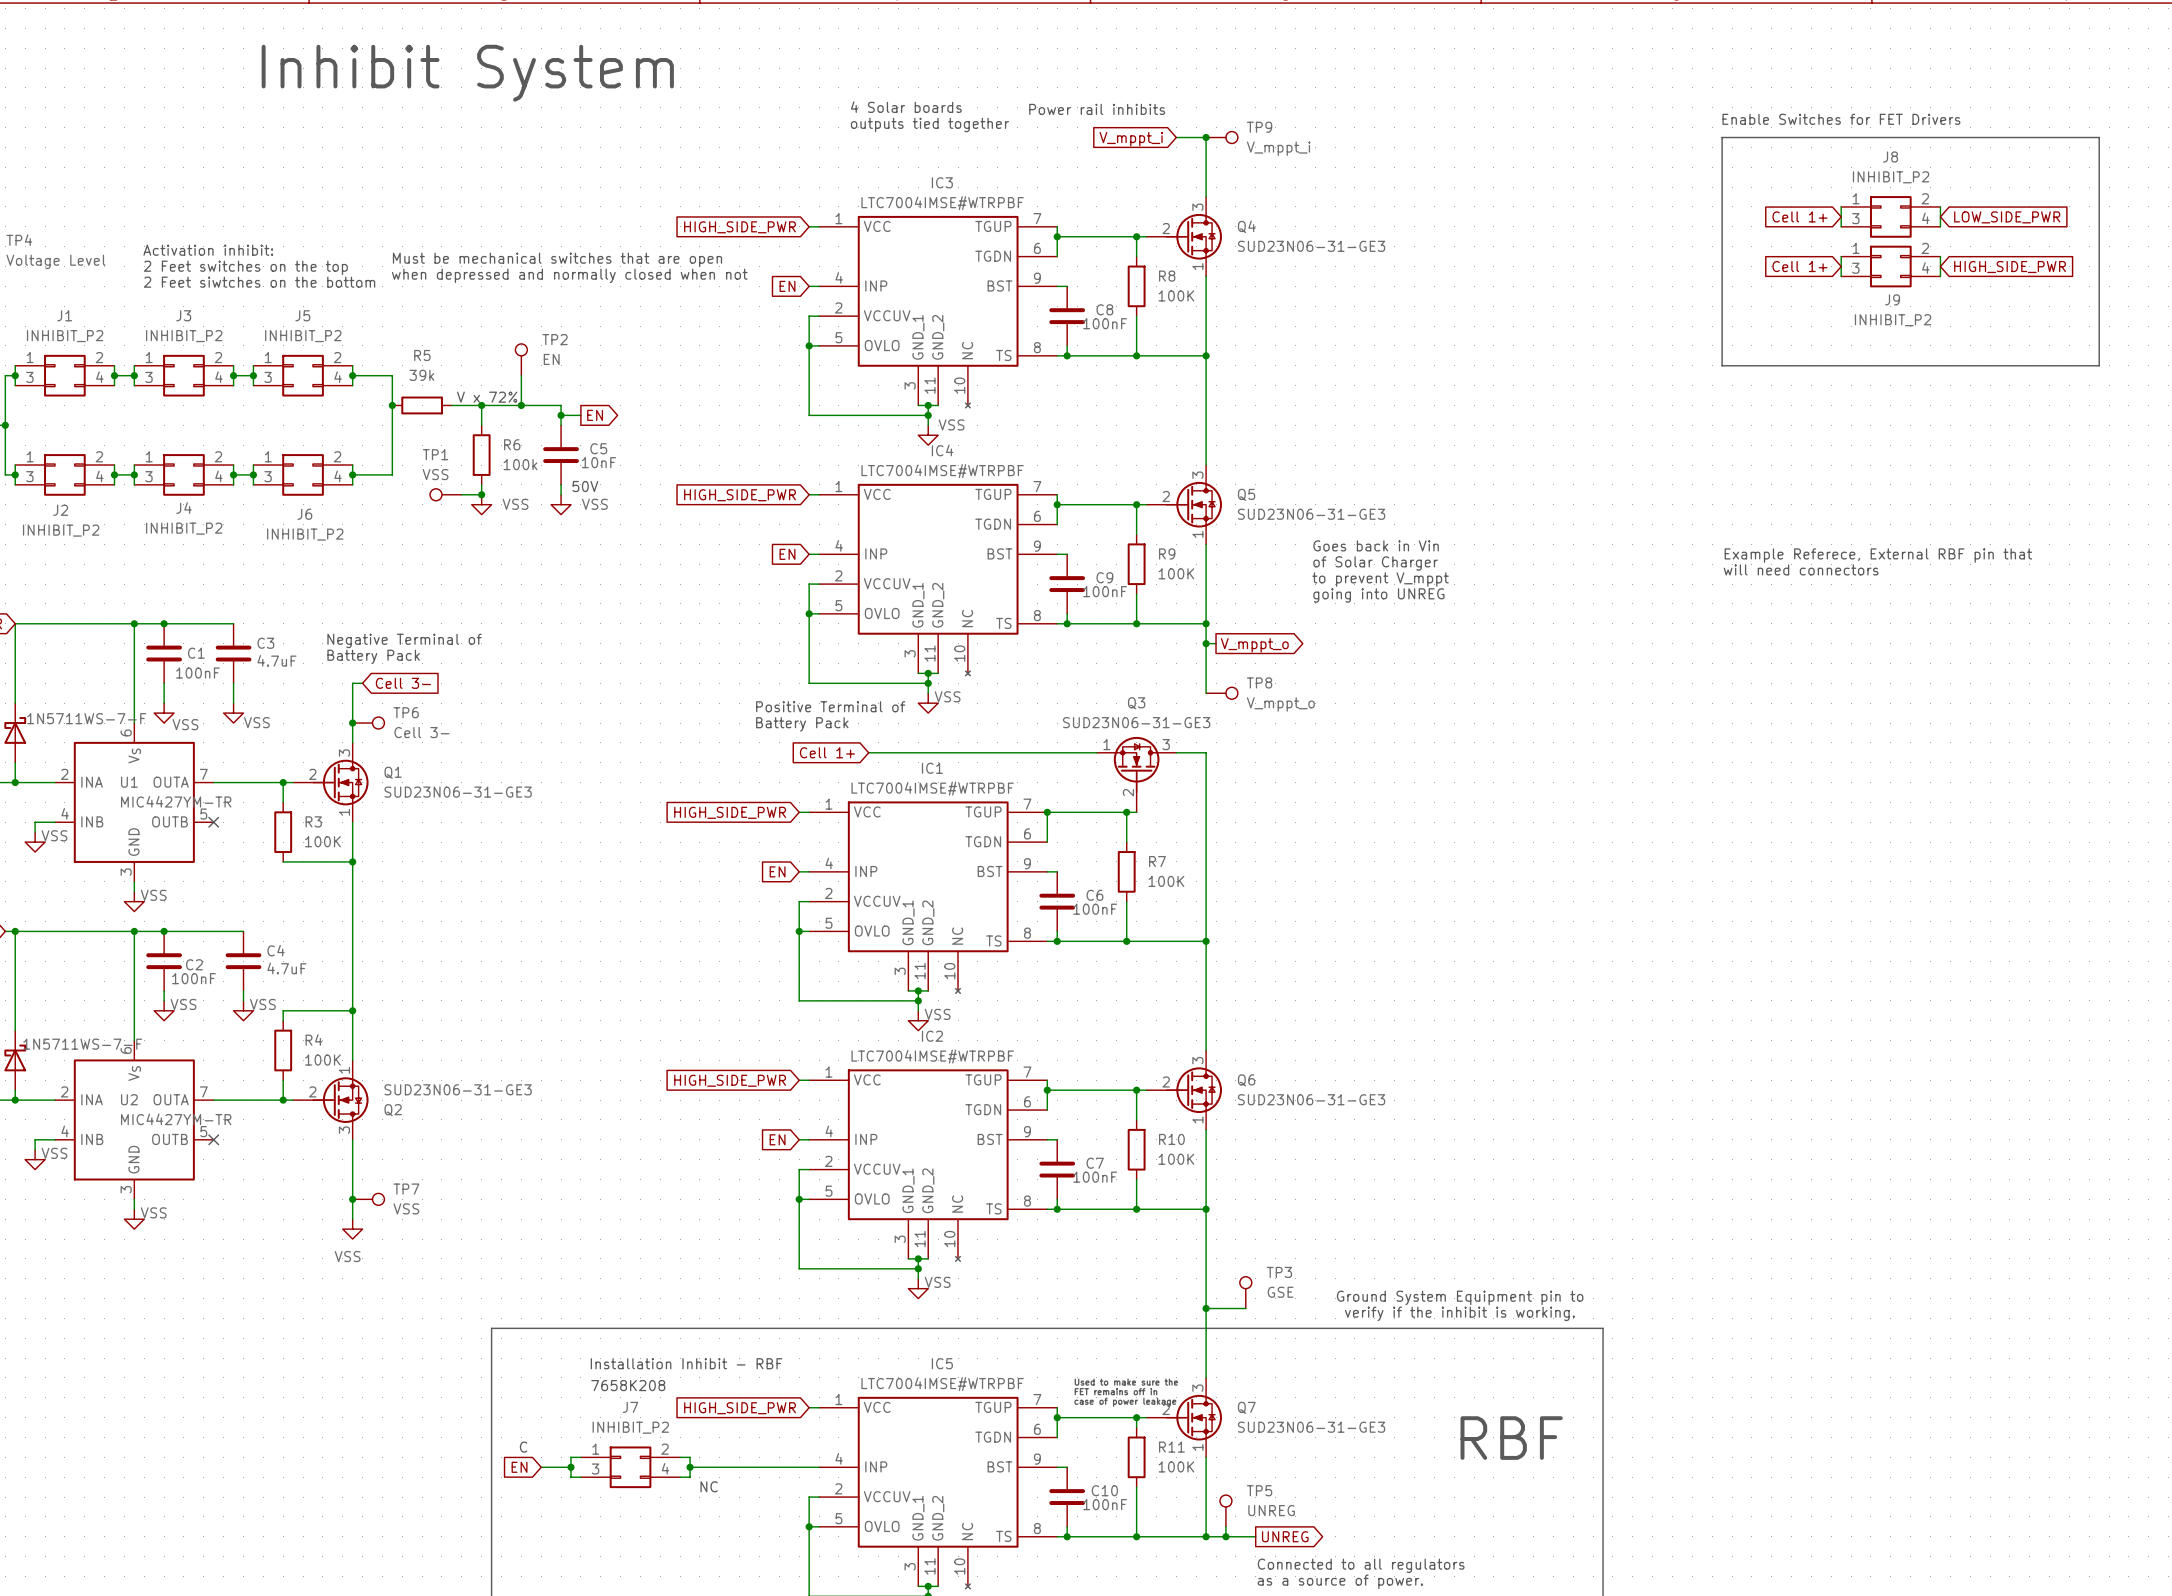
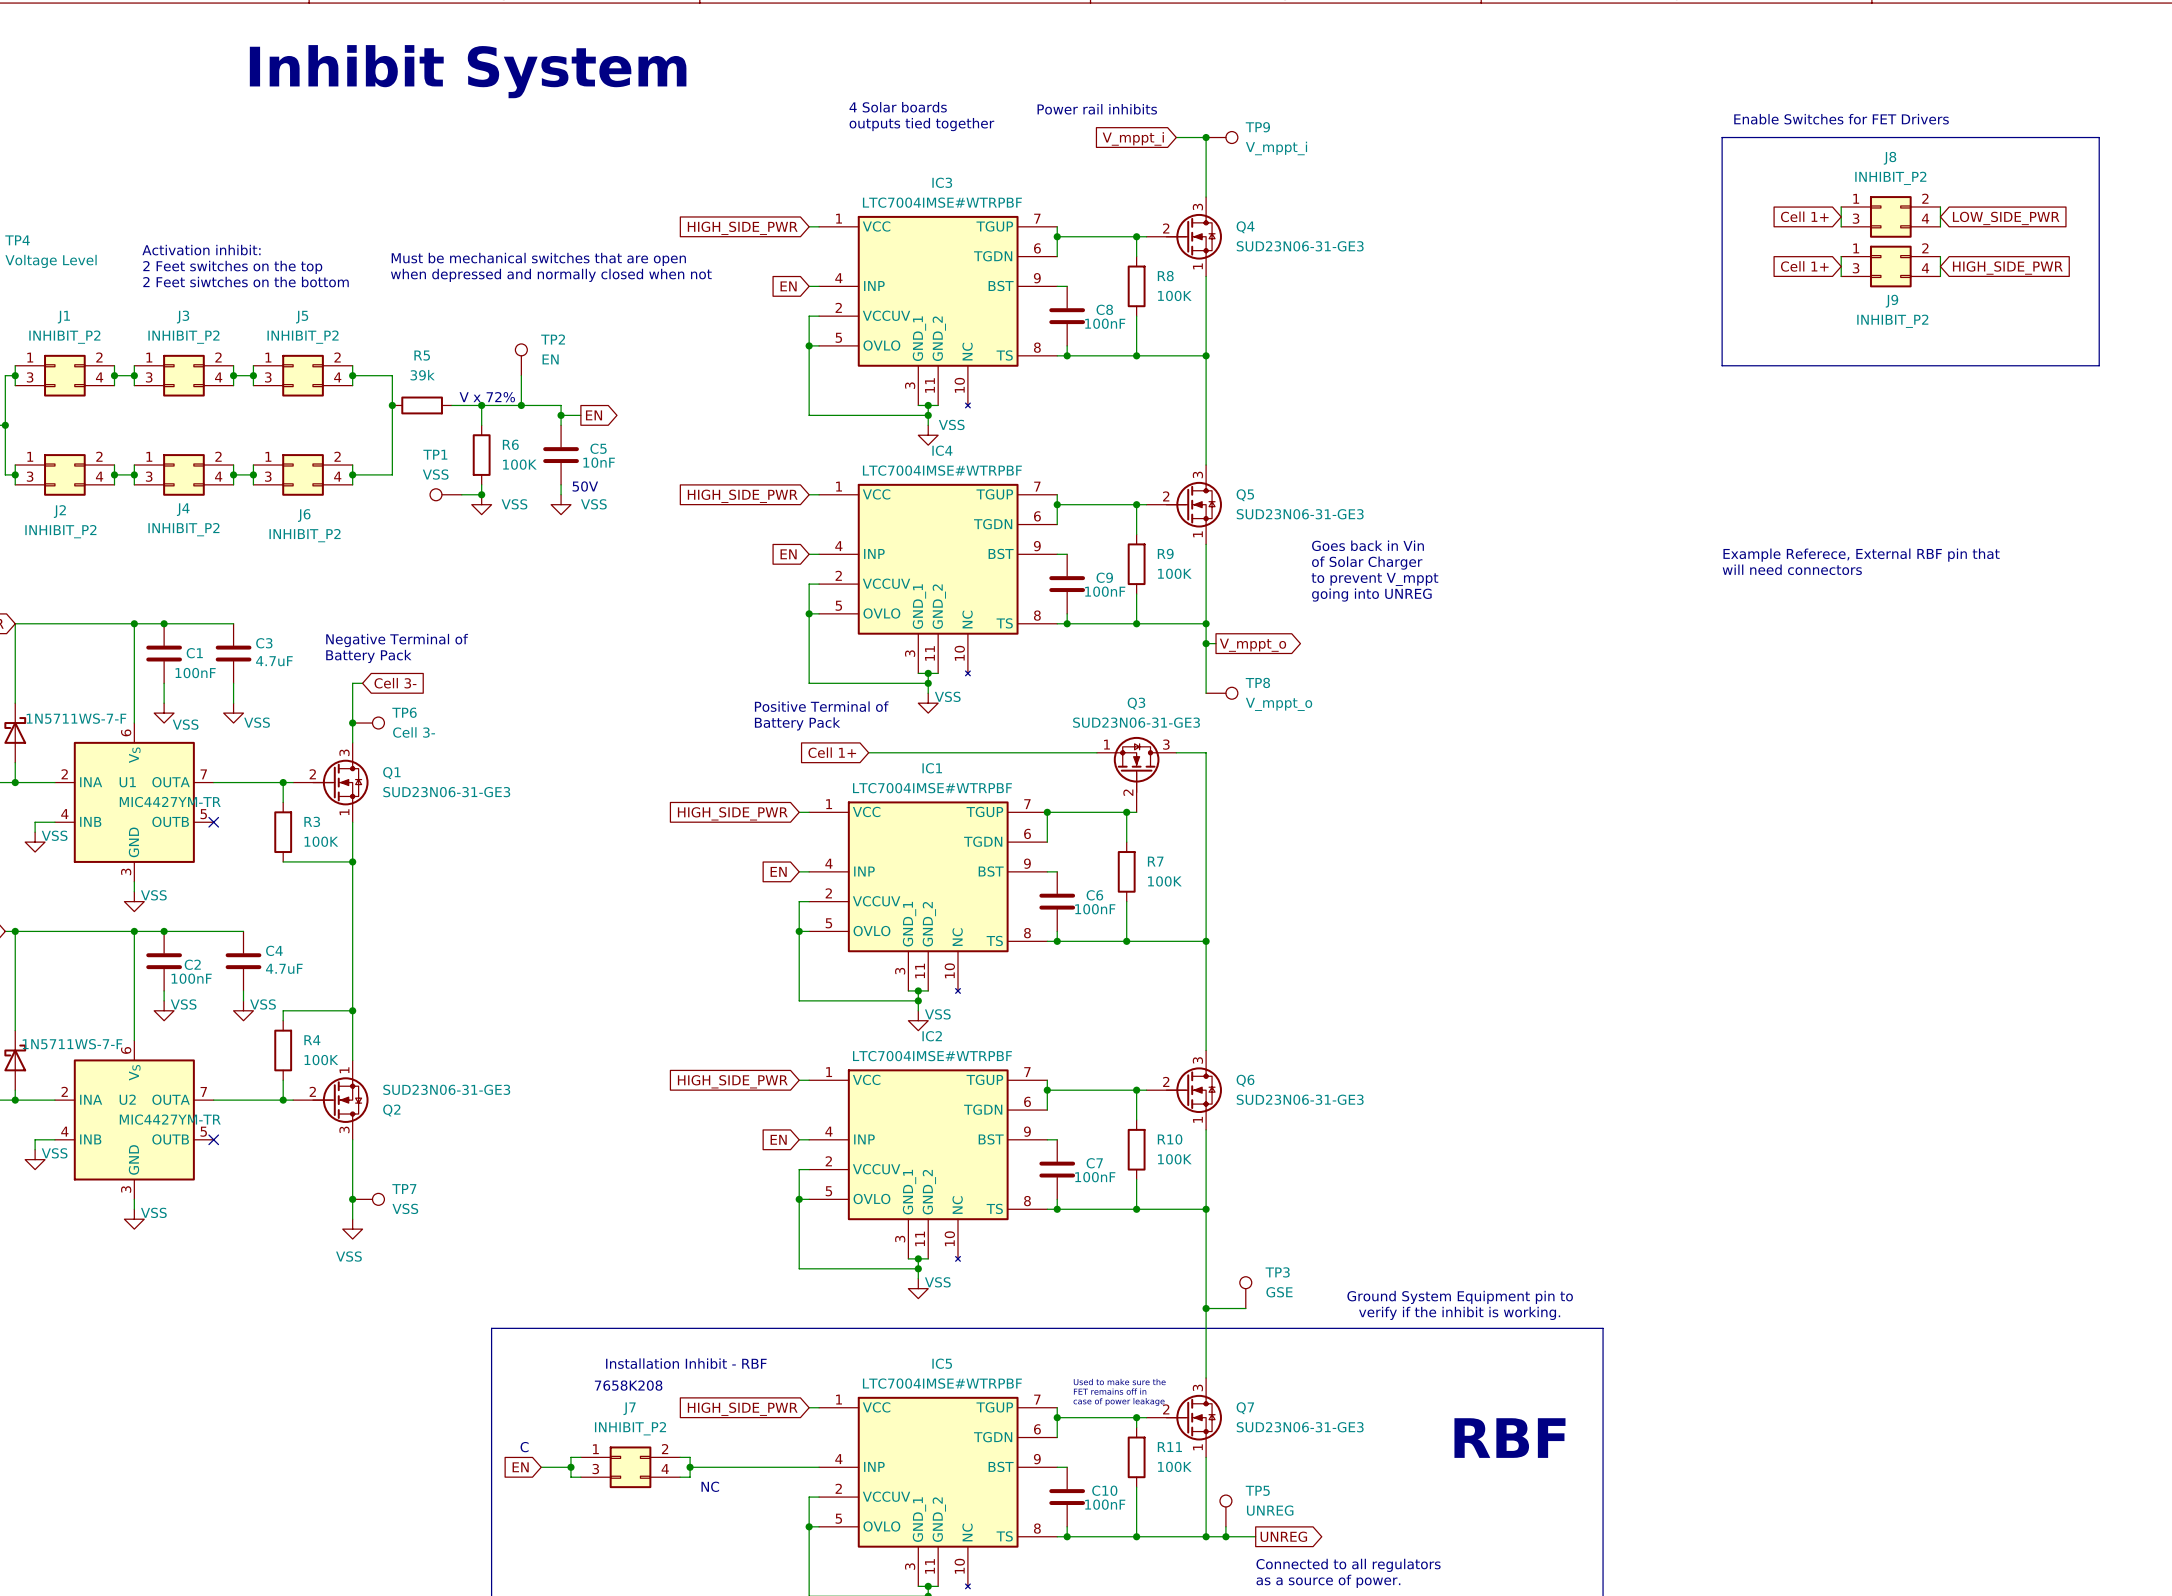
R6 value: 100k (520, 464) -> 100K (519, 464)

